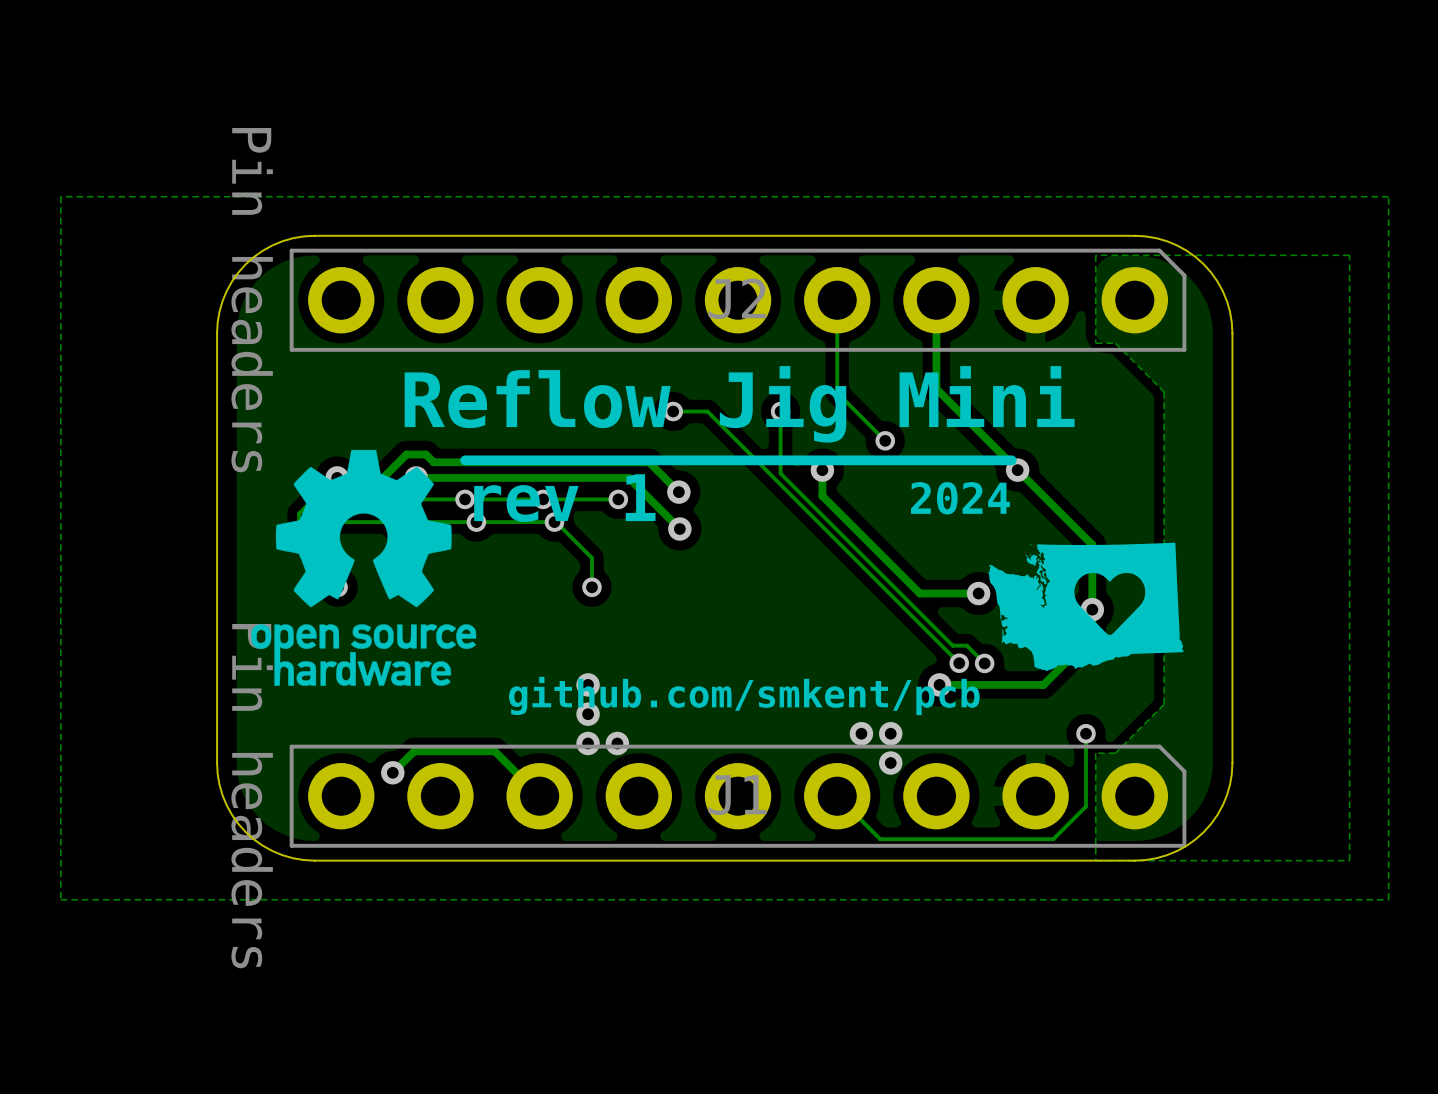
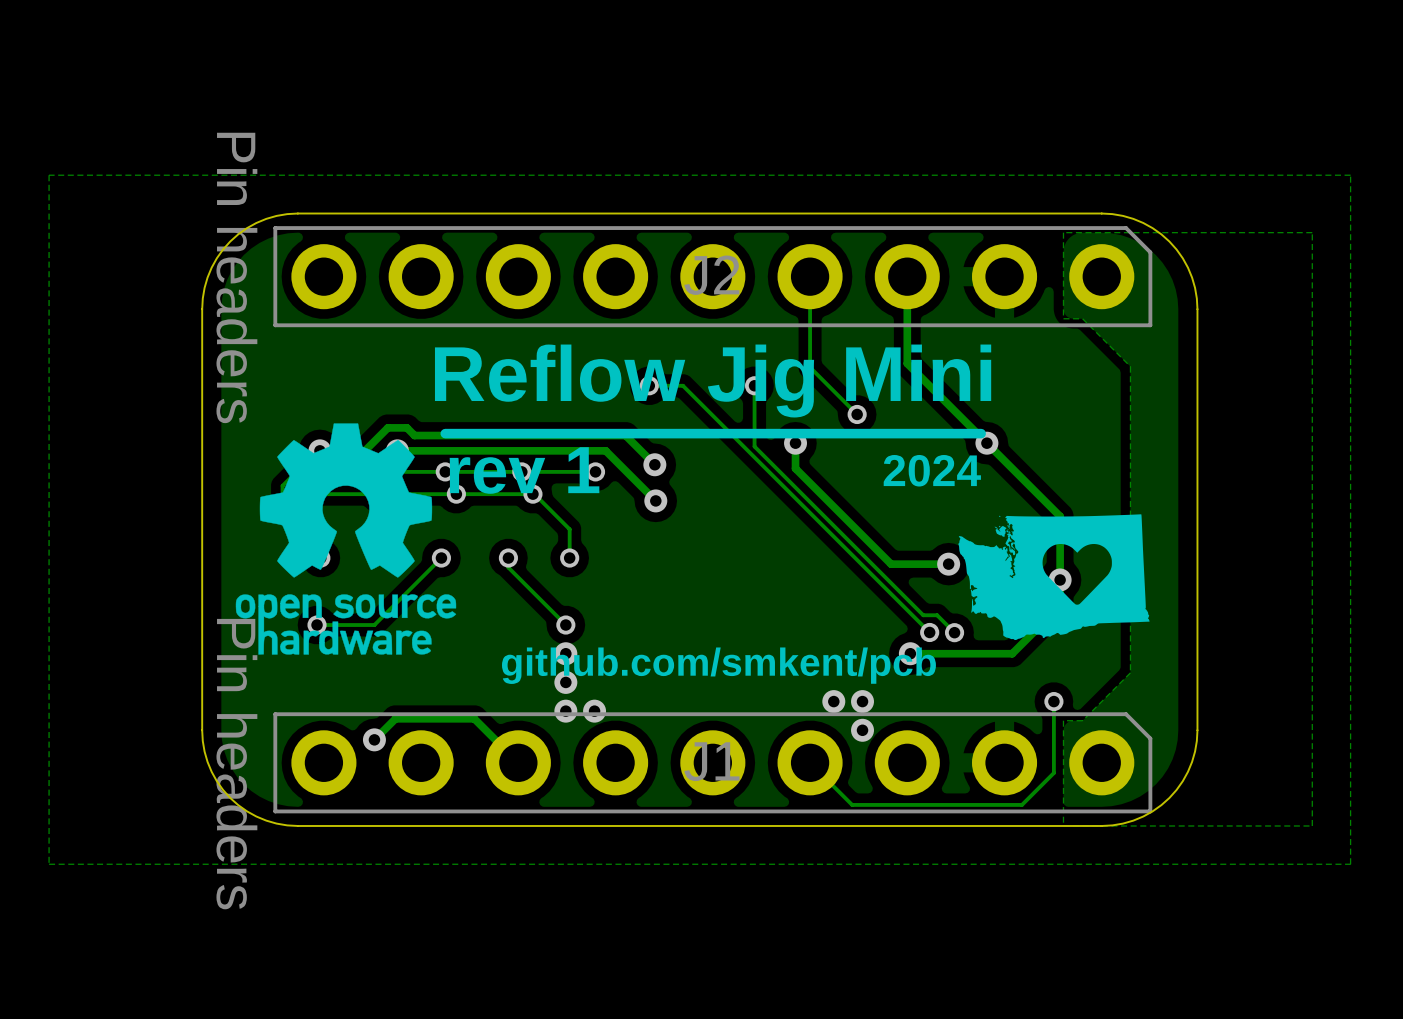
track: none -> (441, 558) (374, 625) (317, 625)
via: none -> (441, 558)
track: none -> (508, 558) (508, 567) (565, 625)
via: none -> (508, 558)
via: none -> (317, 625)
via: none -> (565, 625)

